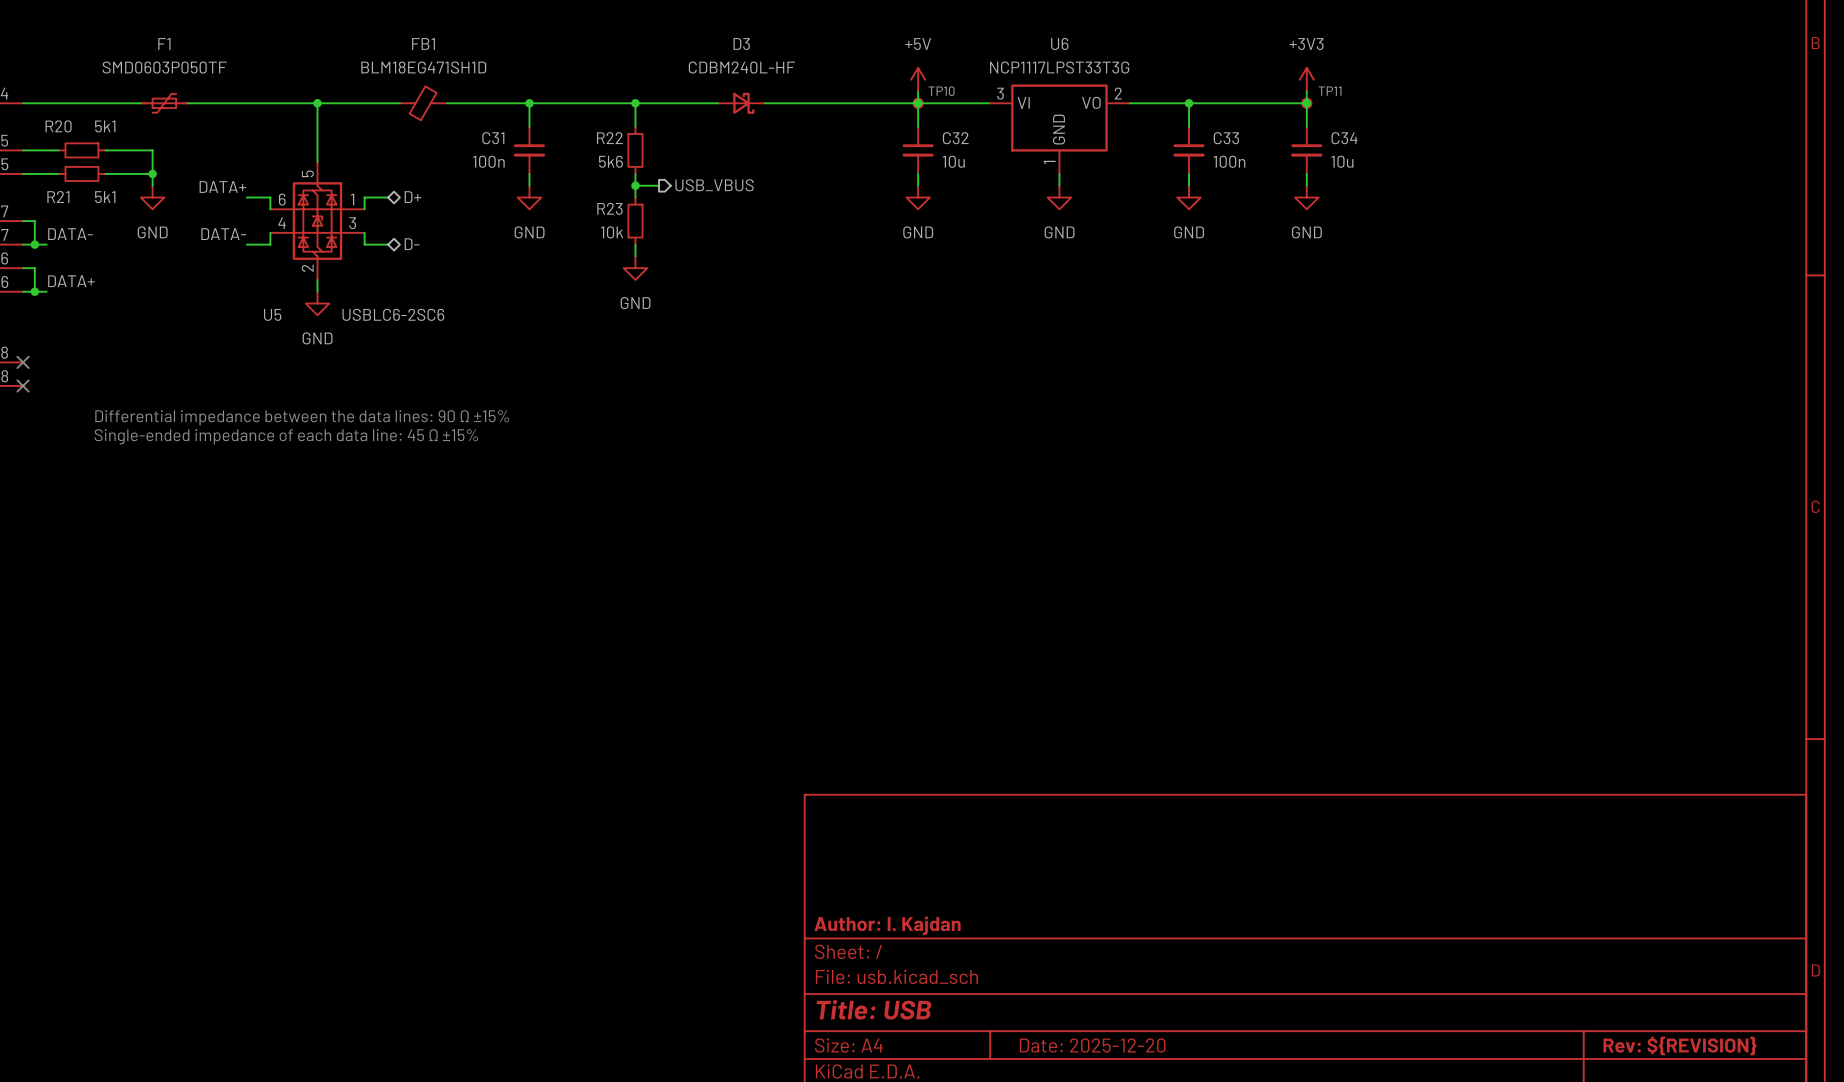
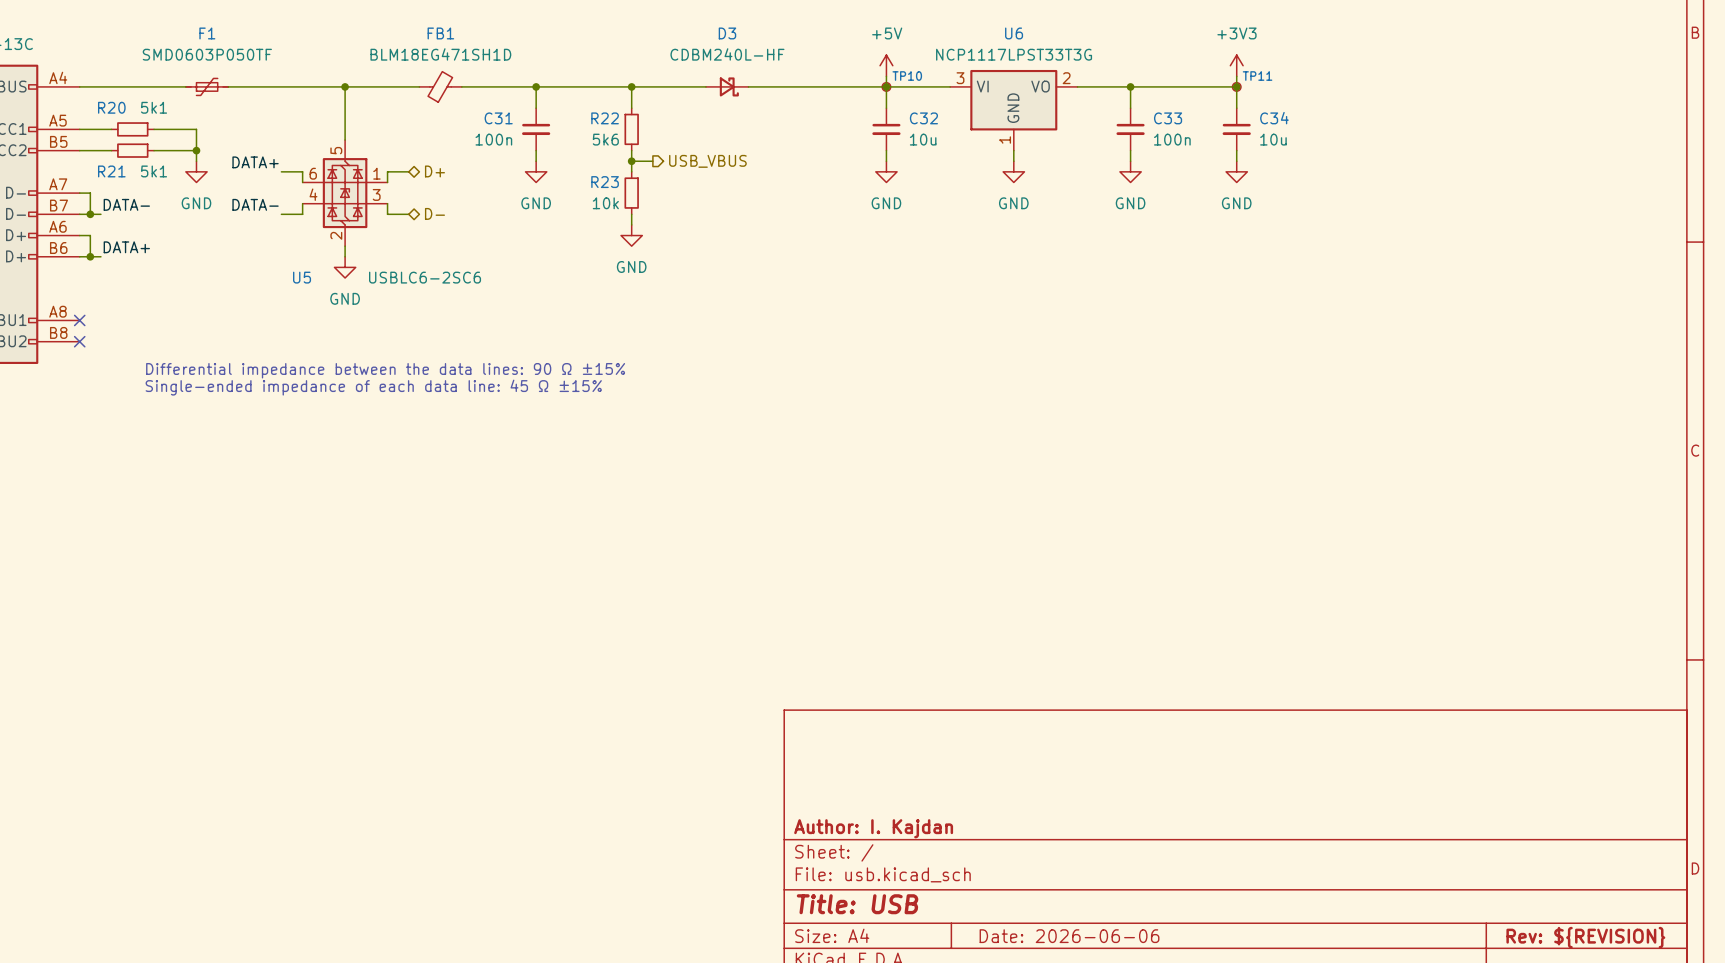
title block: Date: 2025-12-20 (1092, 1045) -> Date: 2026-06-06 (1069, 936)

